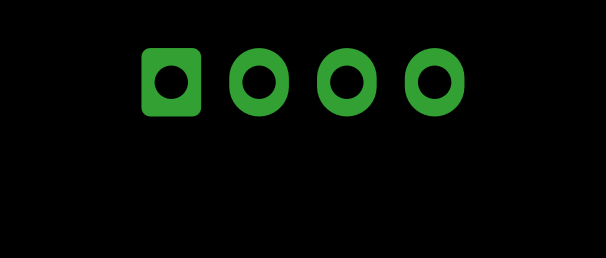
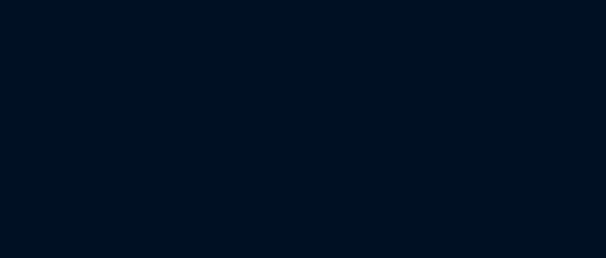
part: (302, 82) -> none

